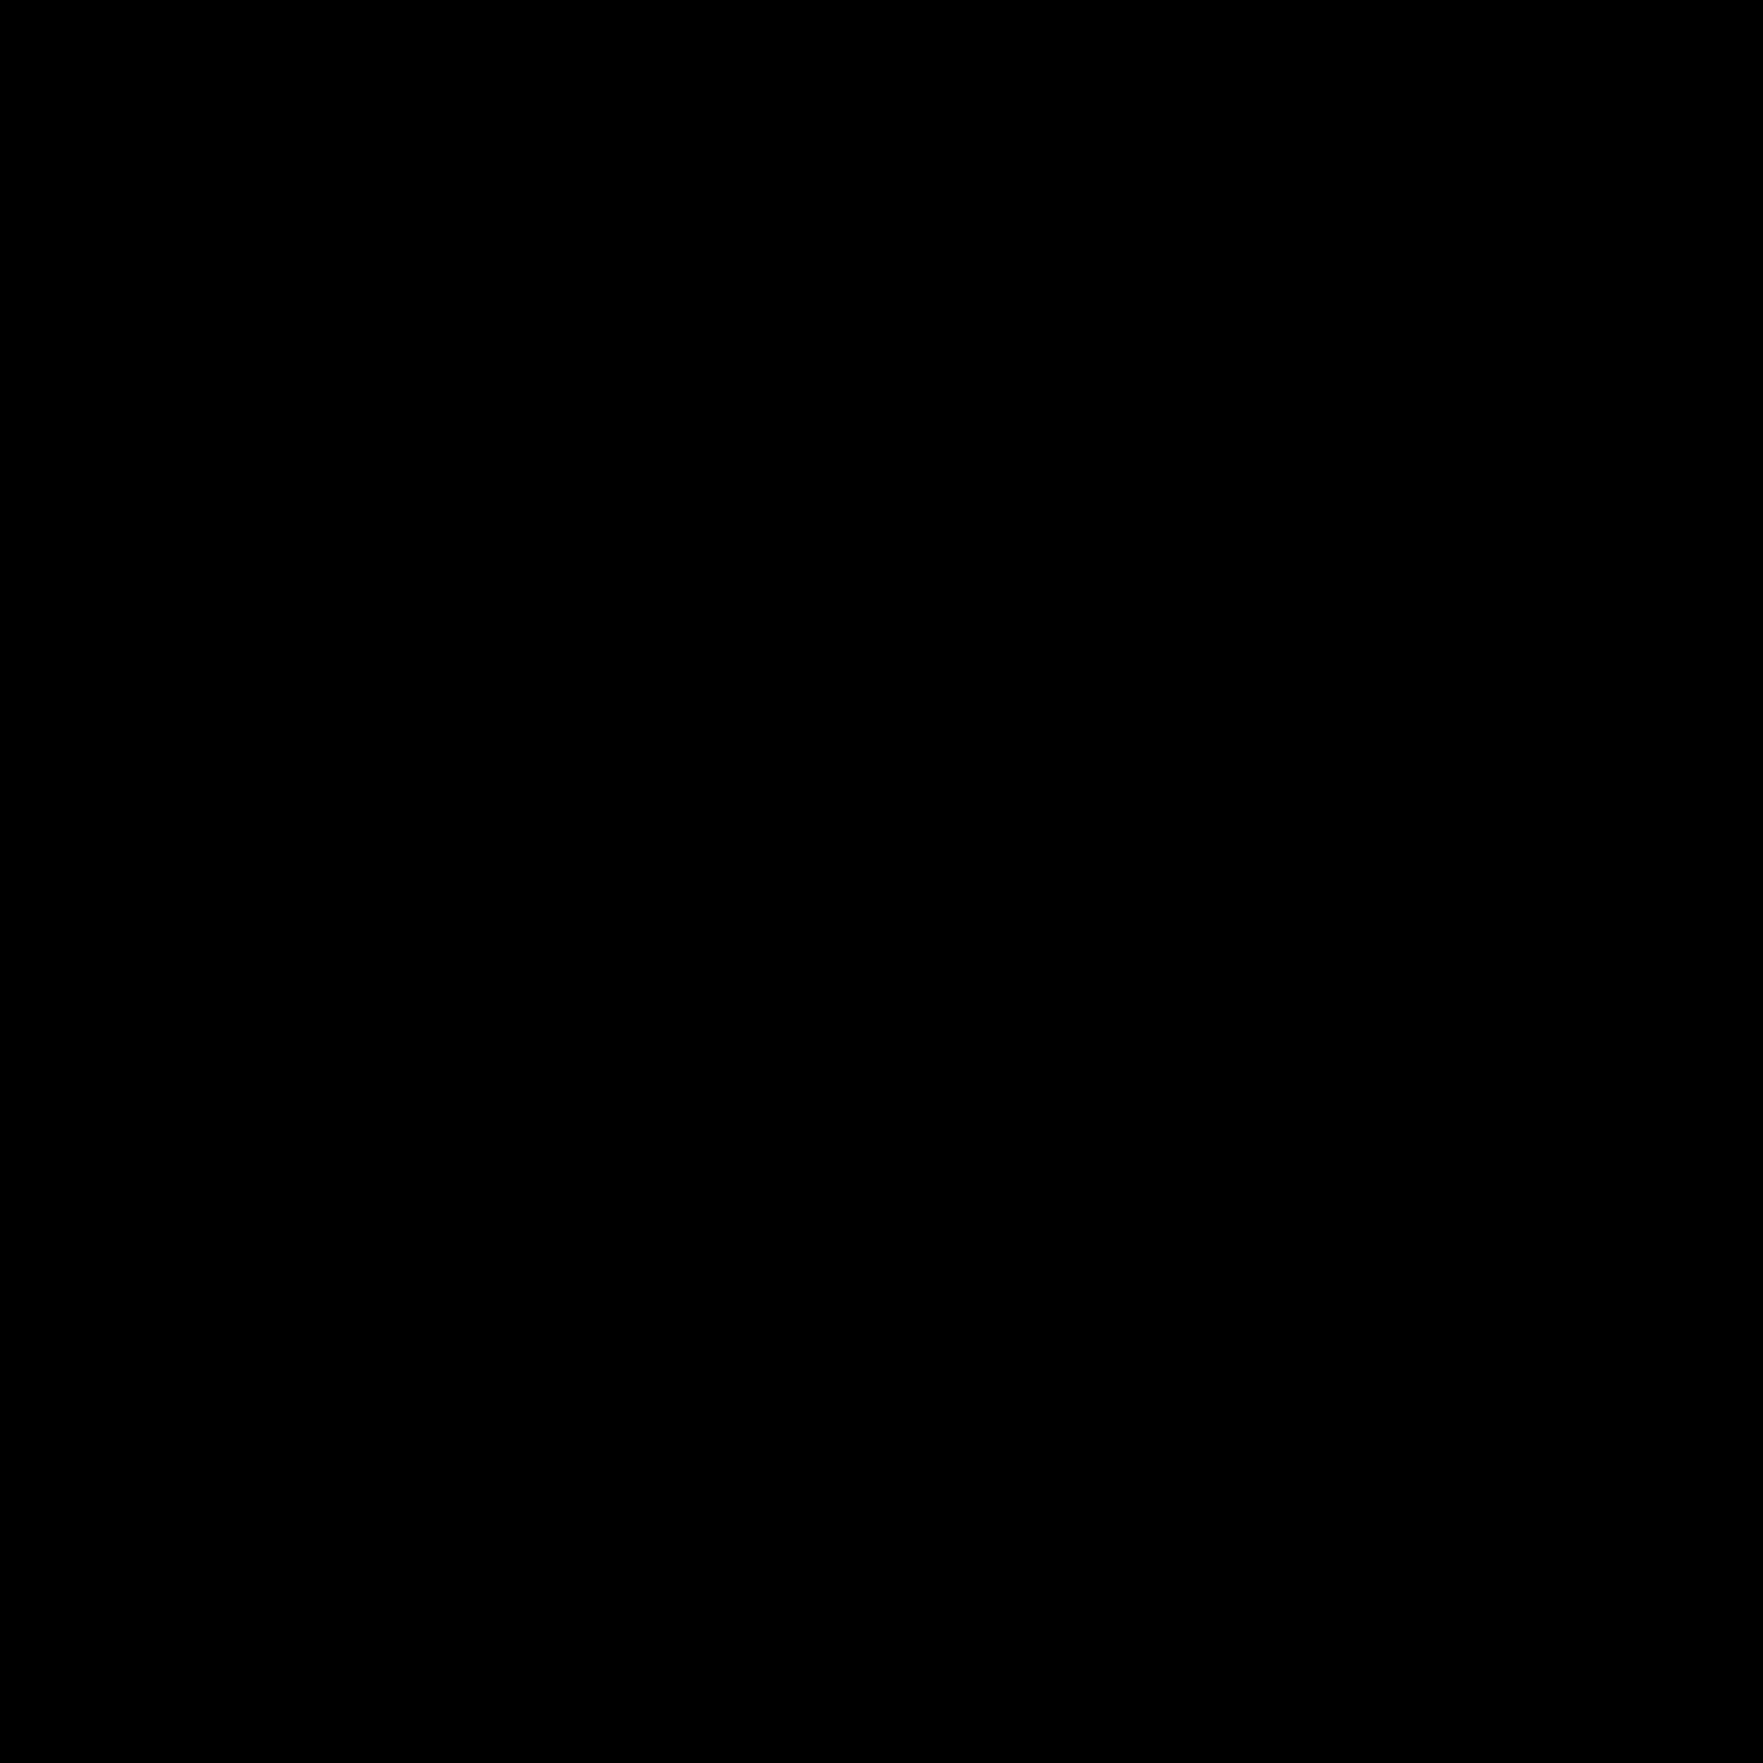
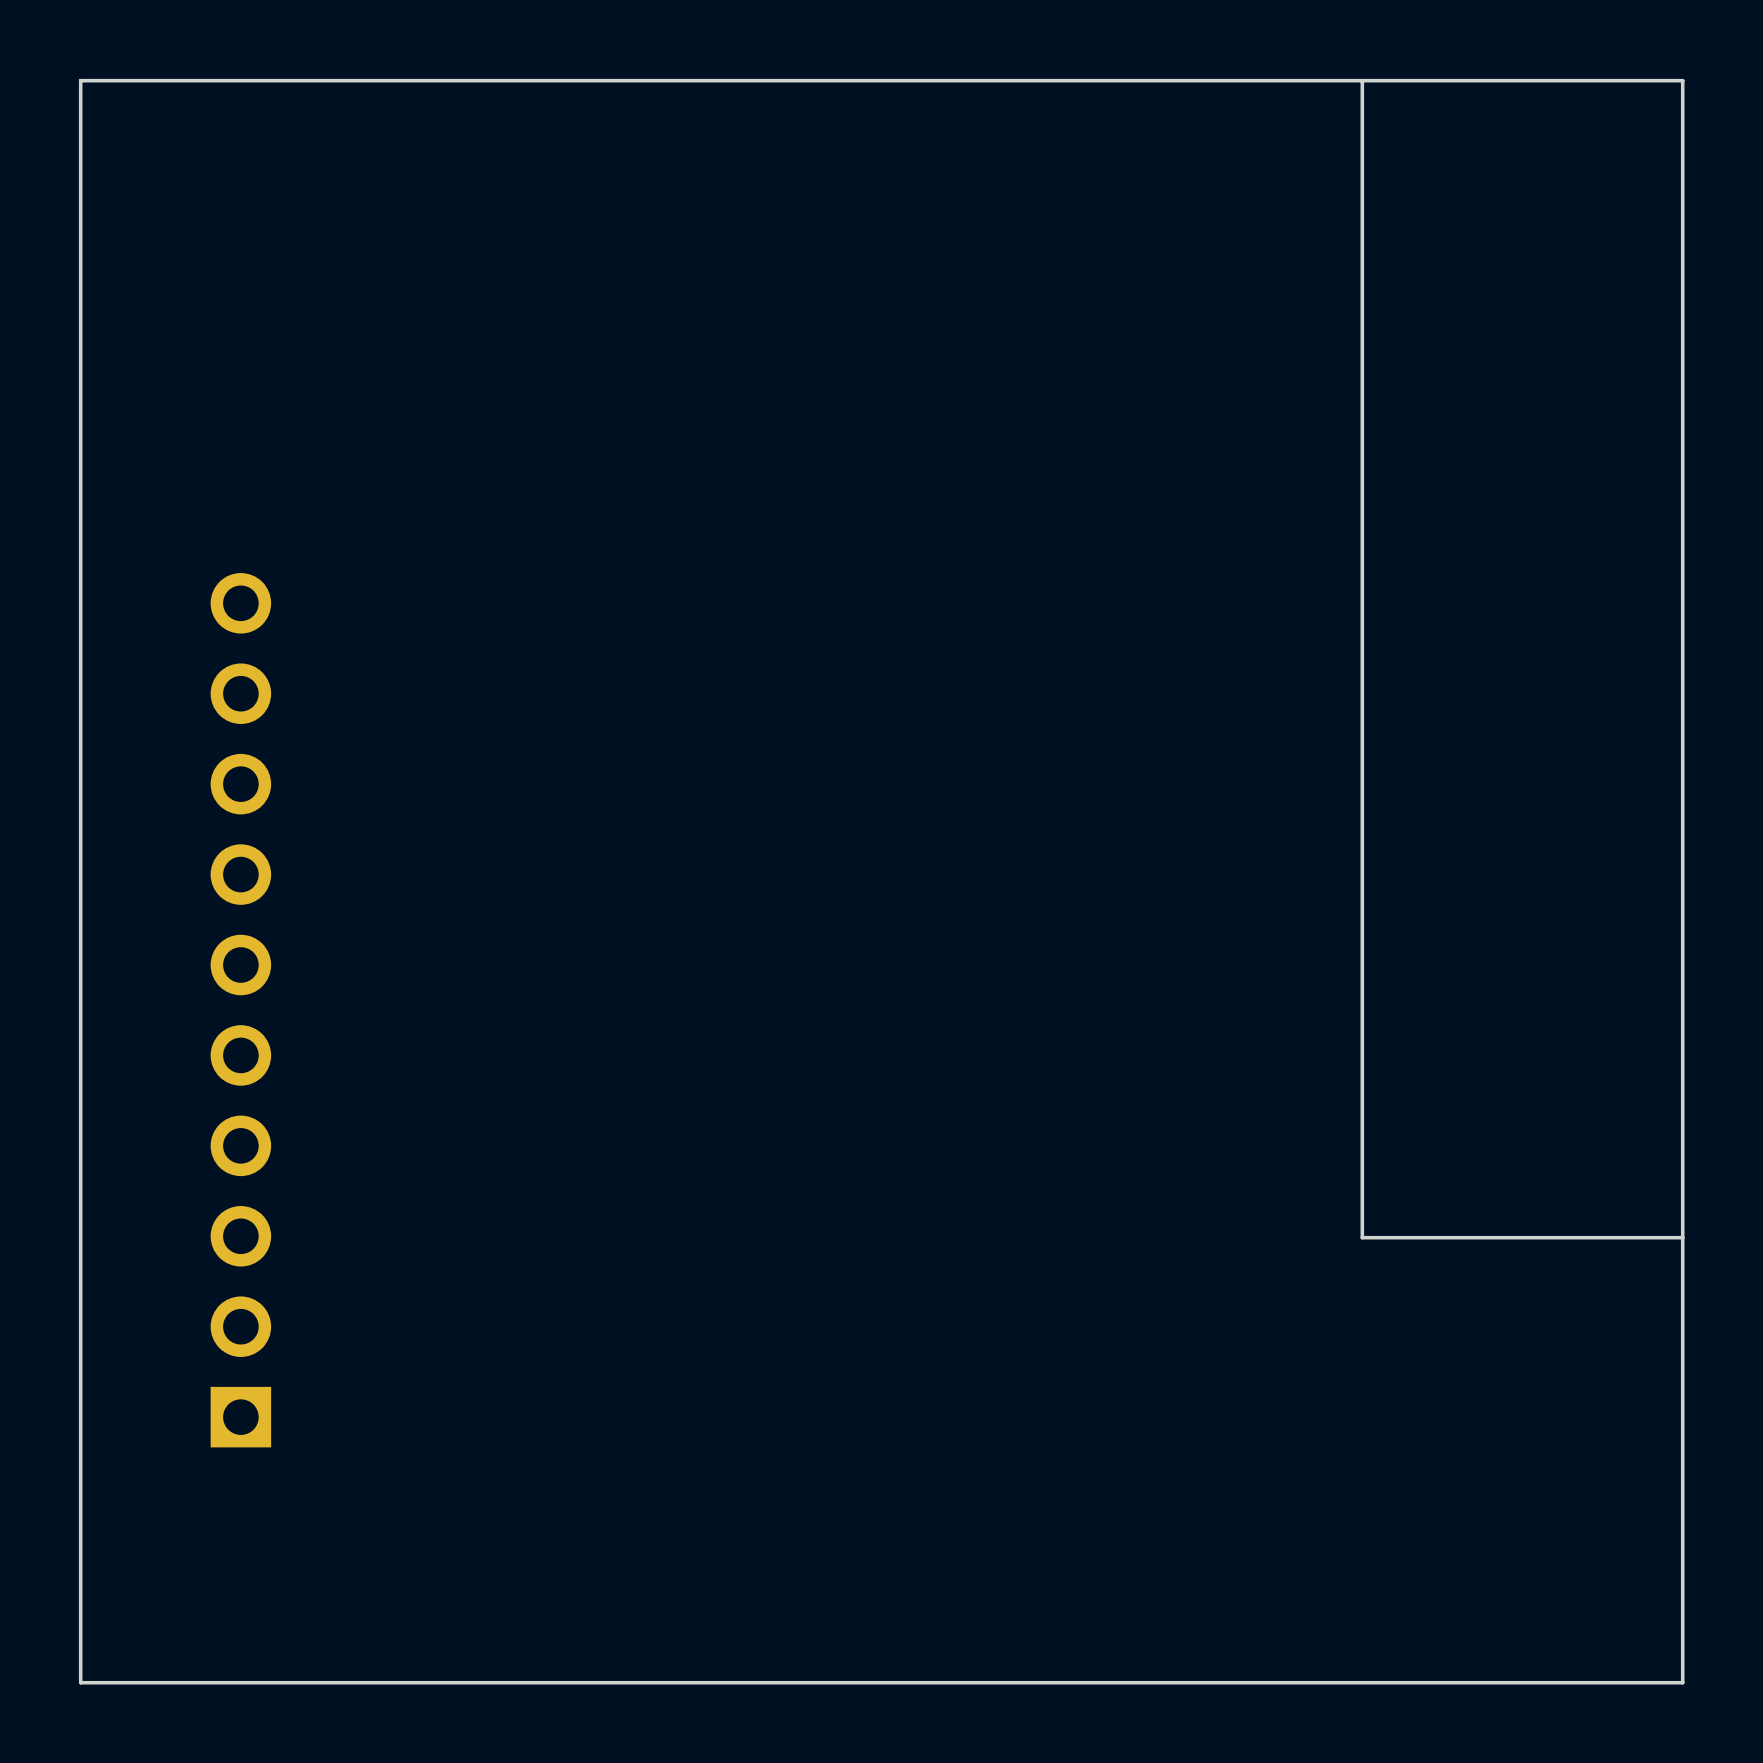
board edge: none -> (1362, 80) (1362, 1237) (1682, 1237)
board edge: none -> (1682, 80) (80, 80) (80, 1682) (1682, 1682) (1682, 80)
part: none -> (240, 1010)

